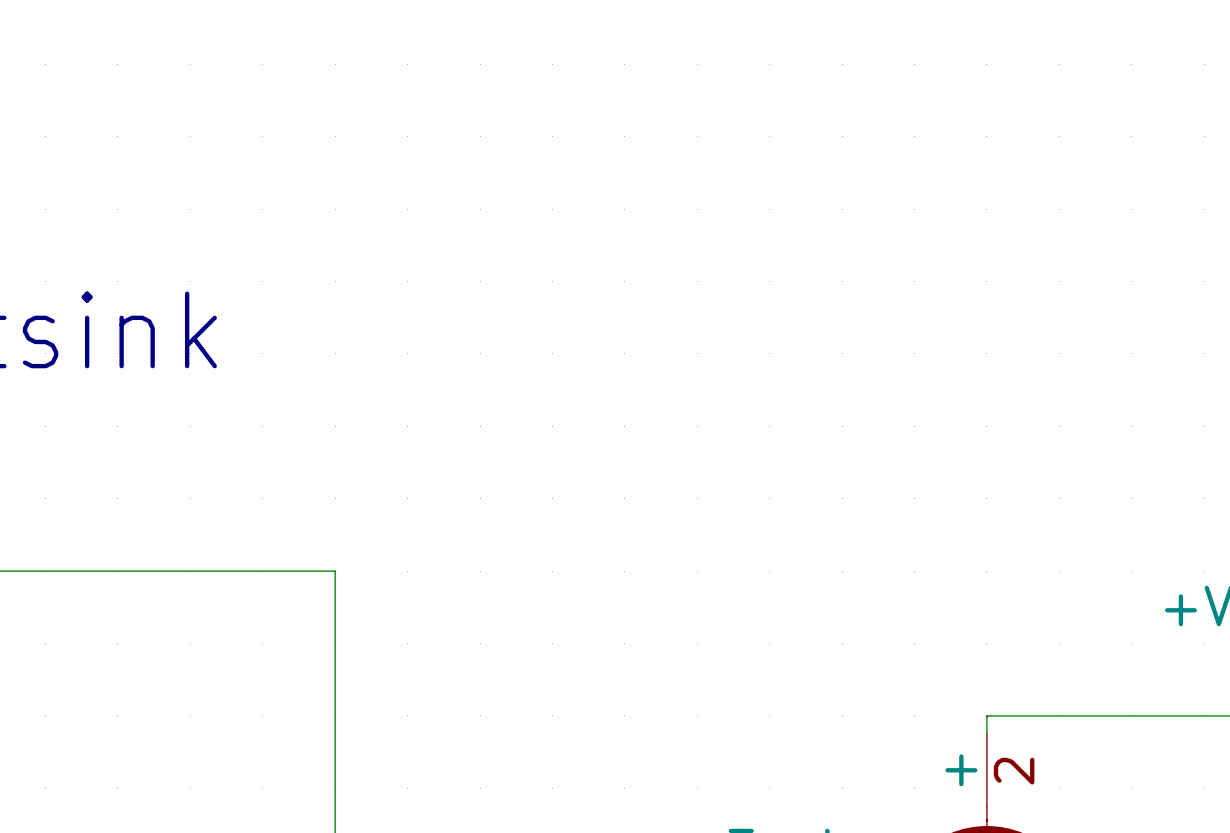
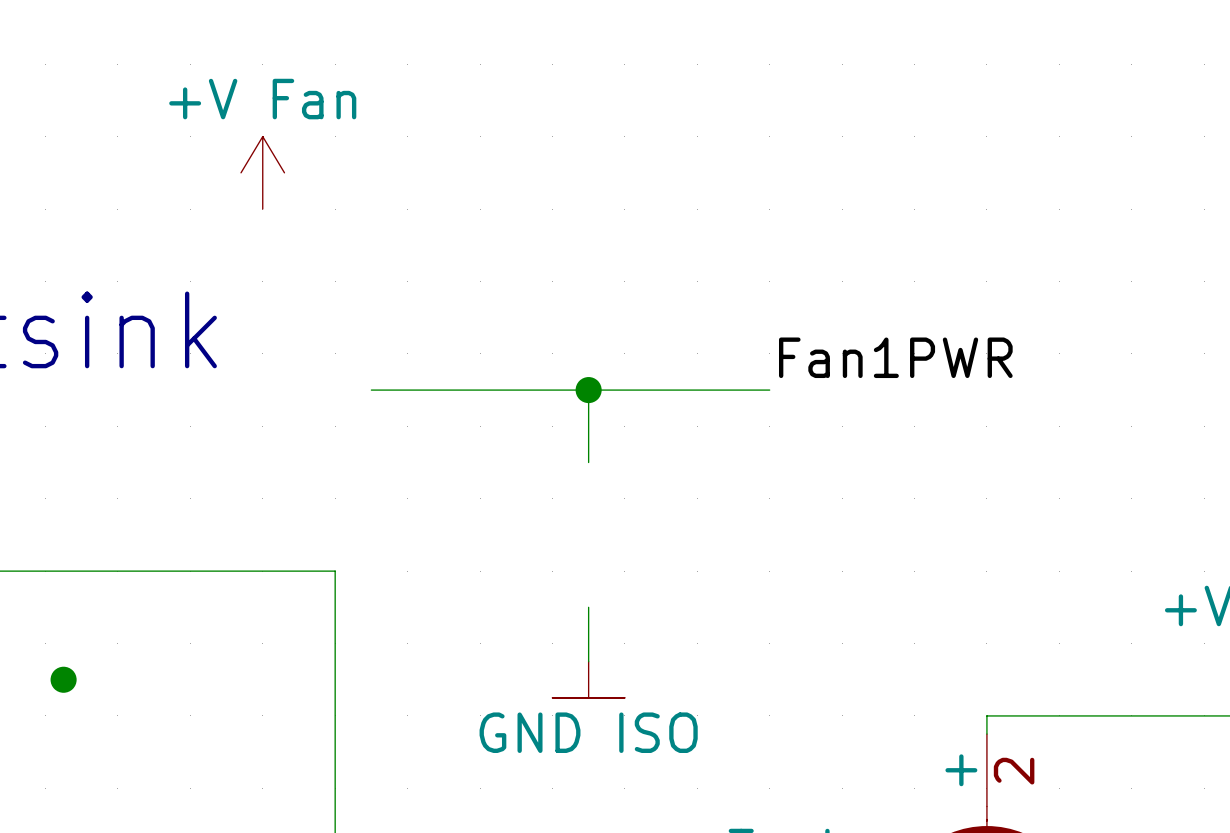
power symbol: none -> +V Fan (262, 172)
label: none -> Fan1PWR (895, 357)
wire: none -> (371, 390) (769, 390)
wire: none -> (588, 390) (588, 462)
junction: none -> (588, 390)
wire: none -> (588, 607) (588, 661)
junction: none -> (63, 679)
power symbol: none -> GND ISO (588, 679)

